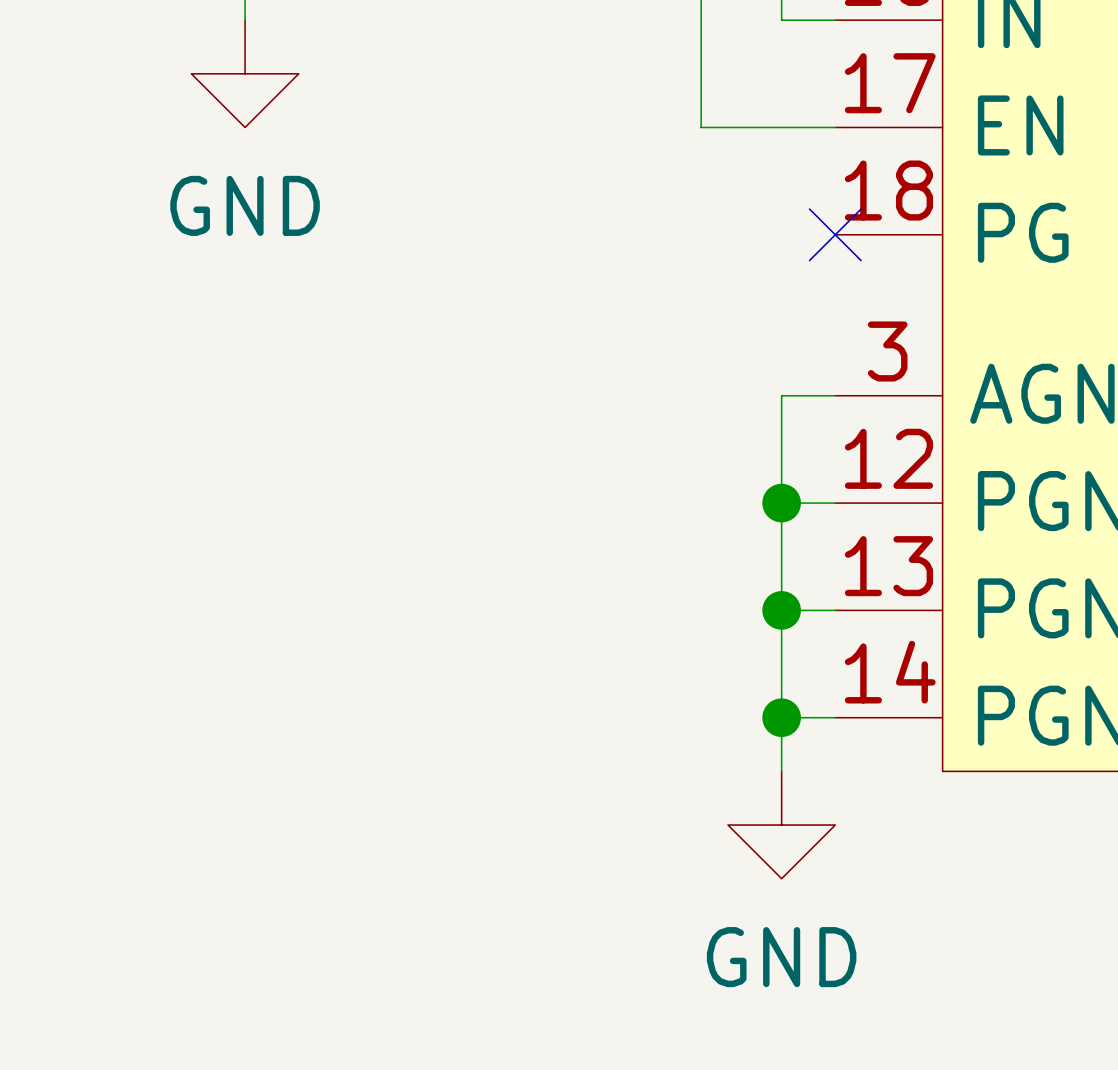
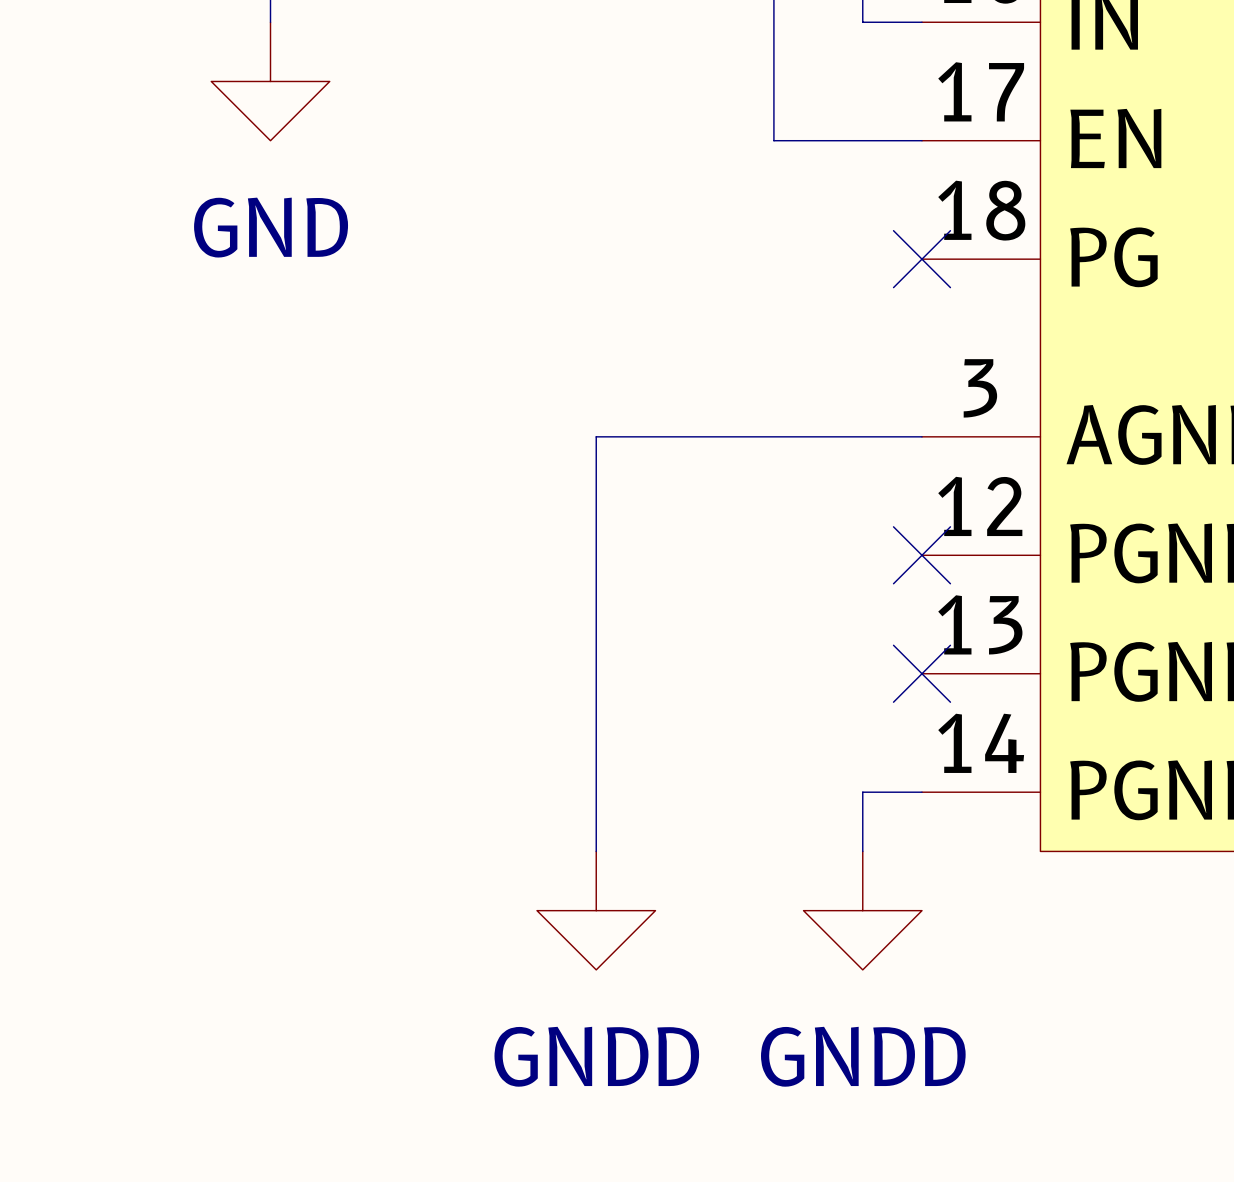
wire: (781, 395) (781, 717) -> (862, 436) (596, 436) (596, 851)
wire: (781, 503) (835, 503) -> none
junction: (781, 503) -> none
no-connect mark: none -> (921, 555)
wire: (781, 610) (835, 610) -> none
junction: (781, 610) -> none
no-connect mark: none -> (921, 673)
junction: (781, 717) -> none
power symbol: none -> GNDD (596, 910)
power symbol: GND (781, 825) -> GNDD (862, 910)

